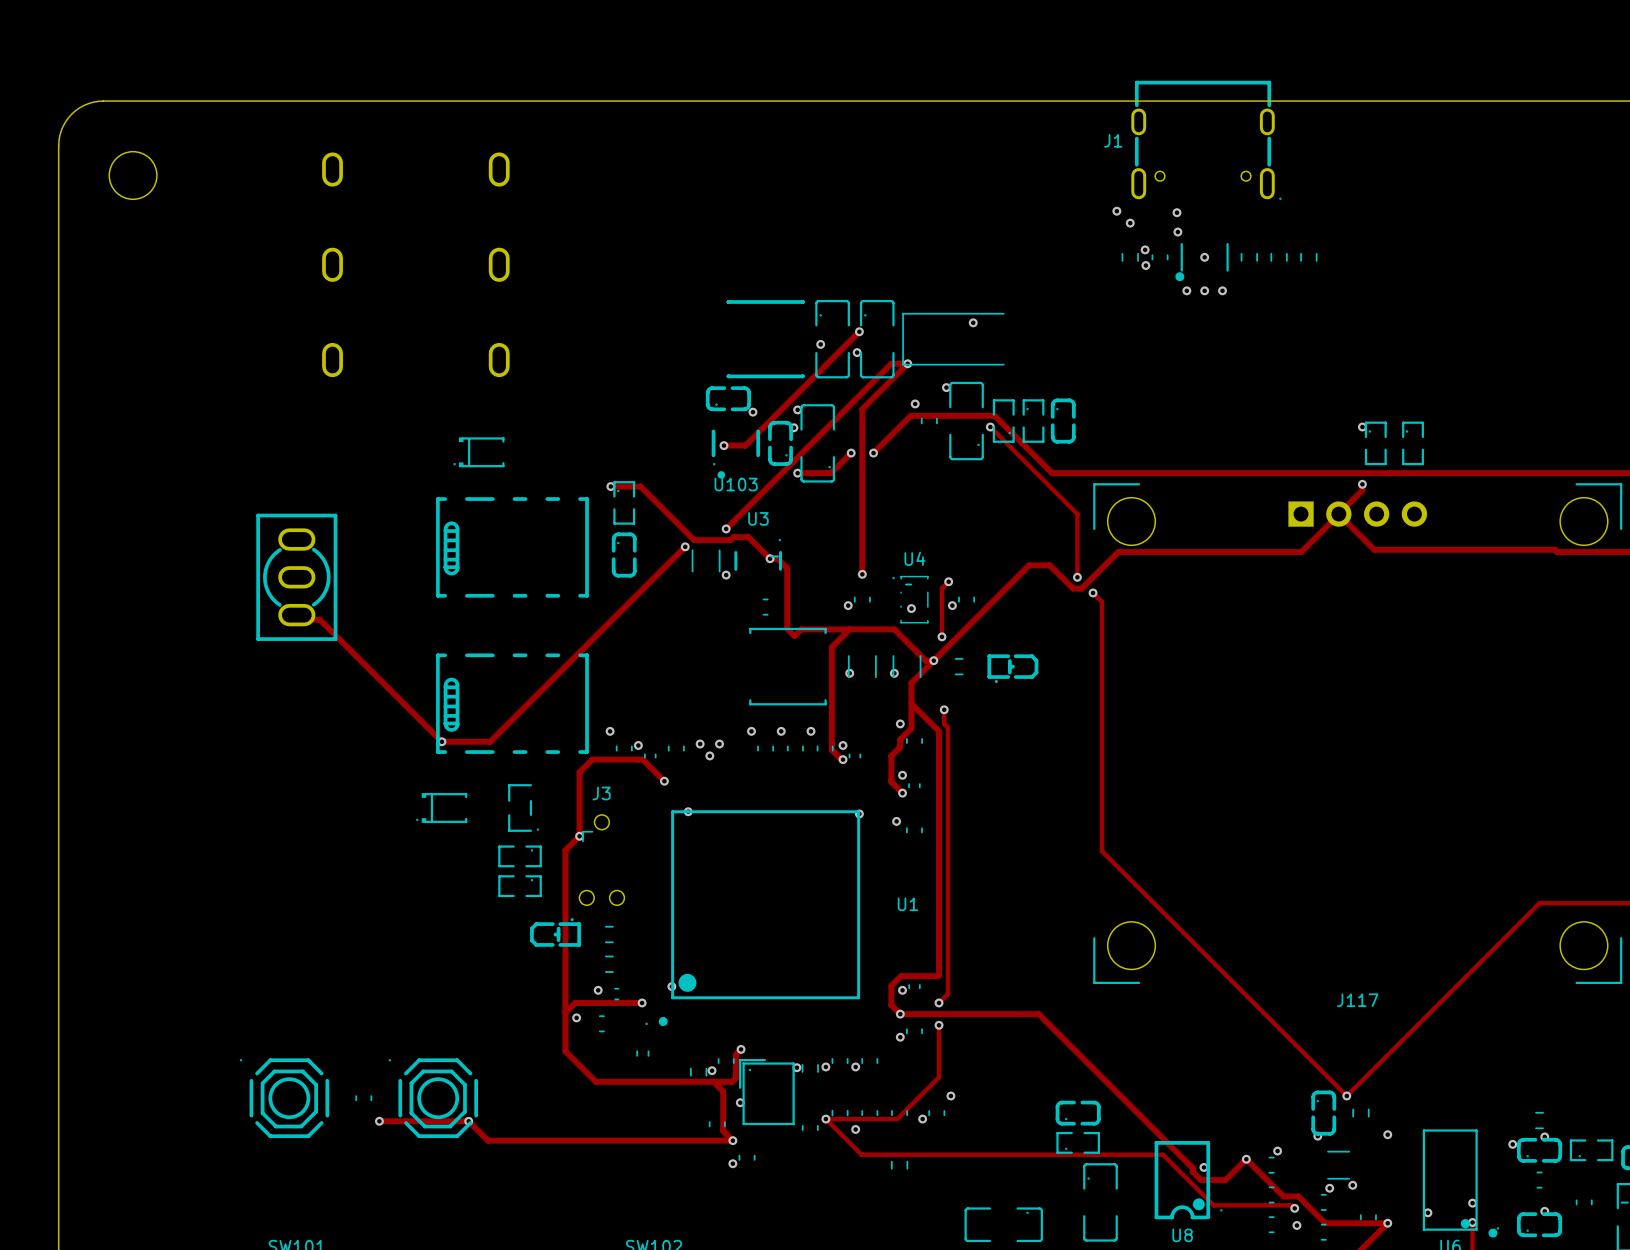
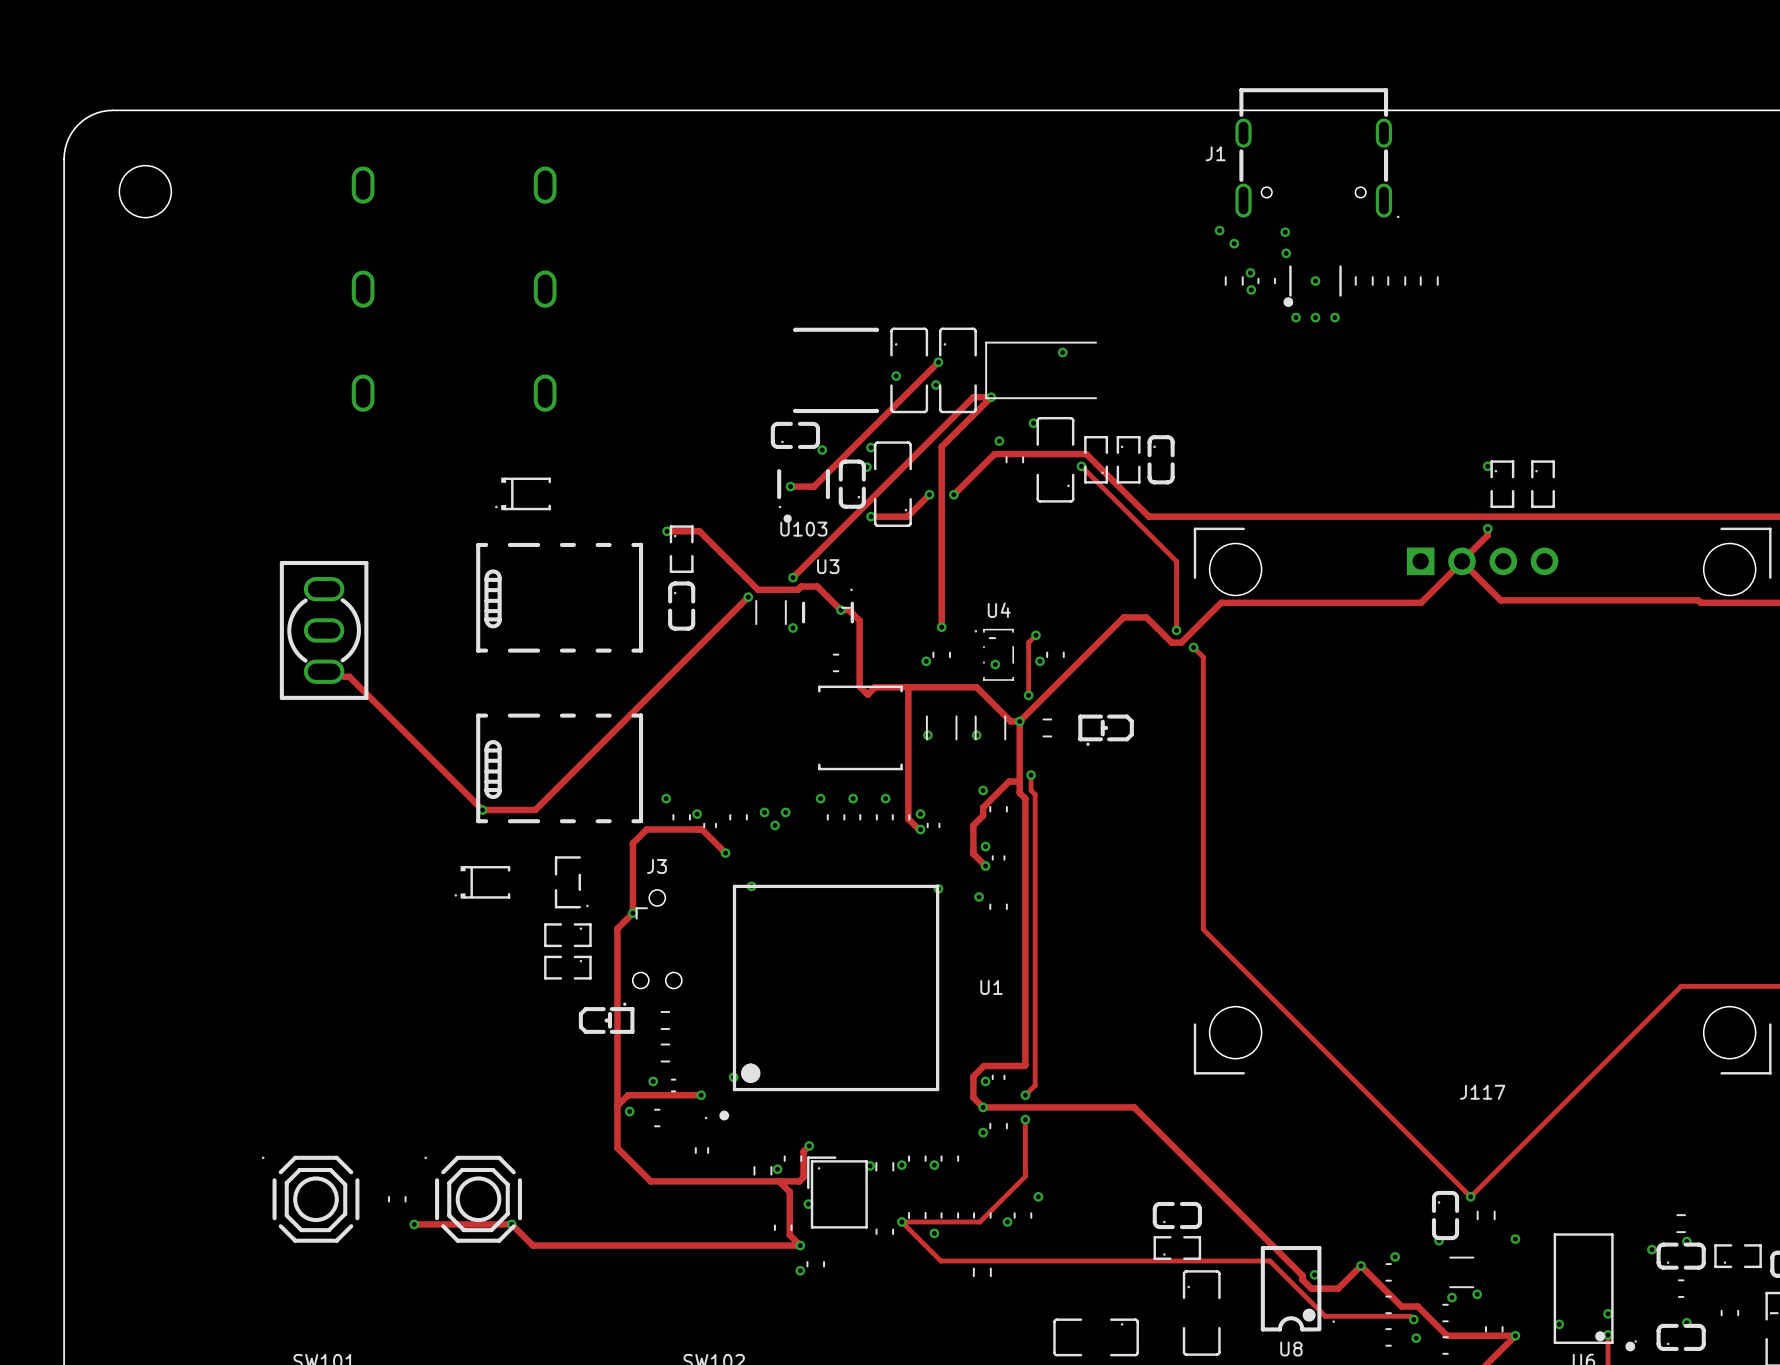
track: (849, 629) (831, 647) -> (908, 687) (908, 706)
track: (933, 660) (911, 682) (911, 728) -> (1019, 721) (1019, 792)
track: (911, 703) (933, 726) -> none
track: none -> (1019, 781) (1009, 781) (995, 795)

